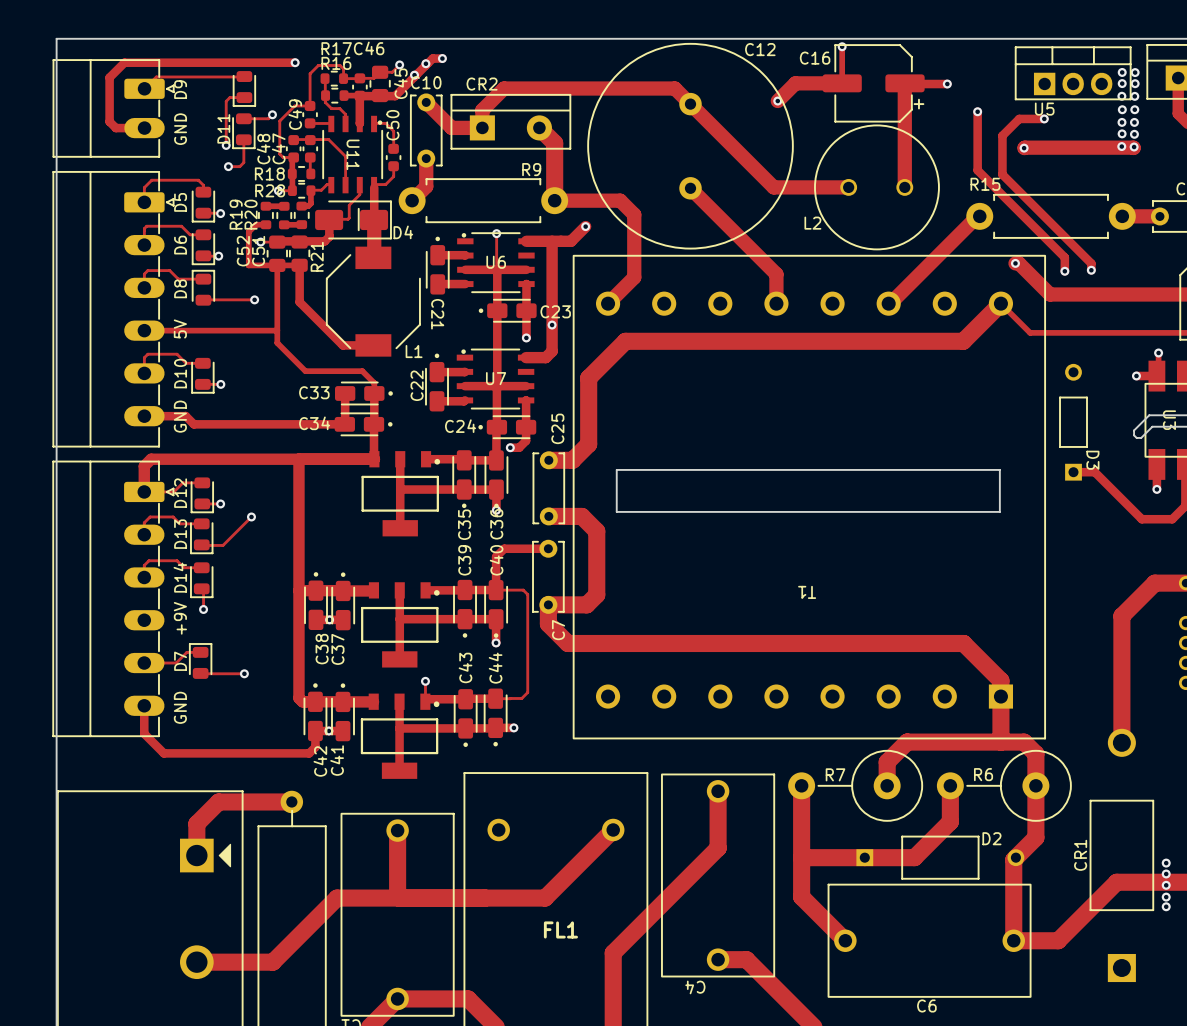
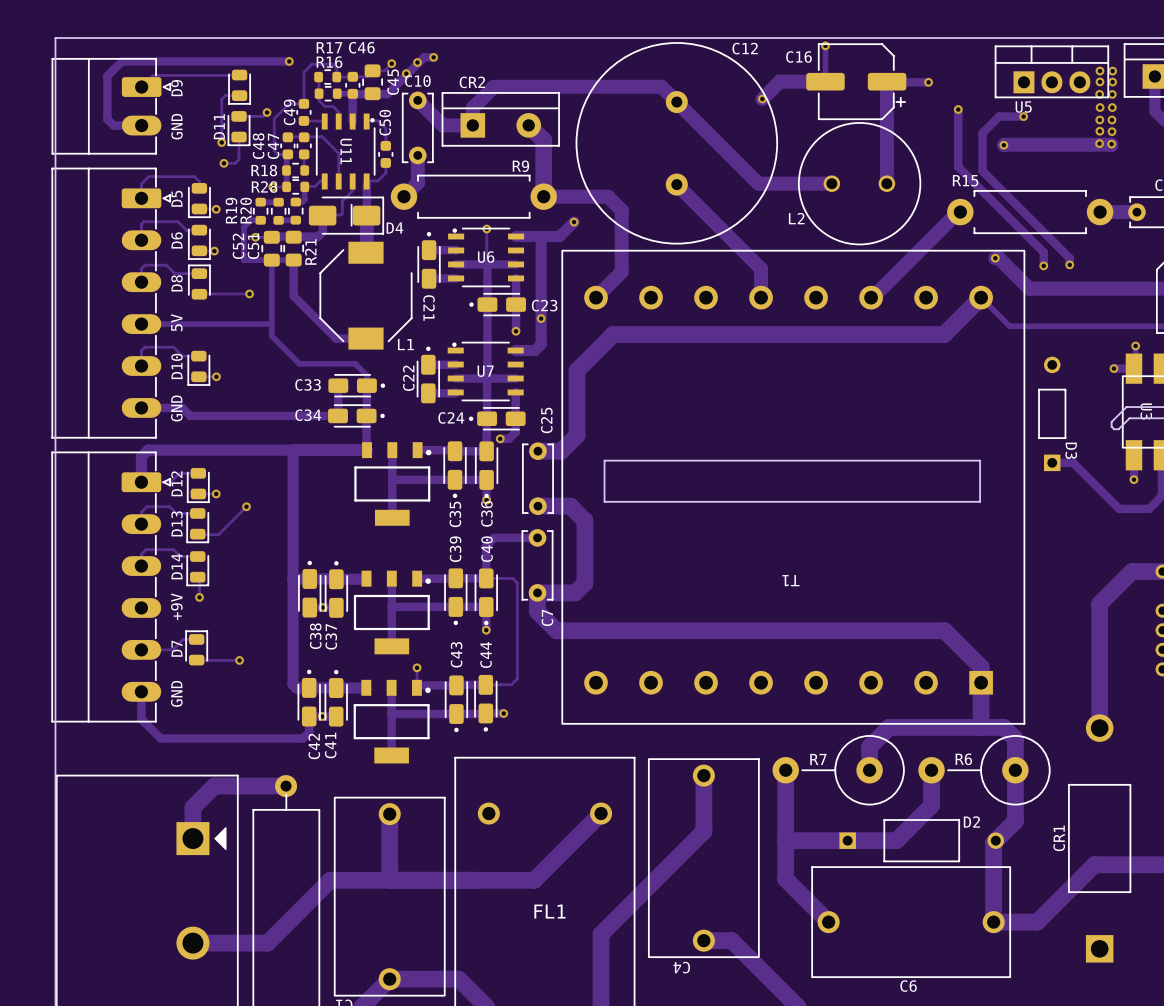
via: (1166, 863) -> none
via: (1166, 873) -> none
via: (1166, 885) -> none
via: (1166, 897) -> none
via: (1166, 906) -> none

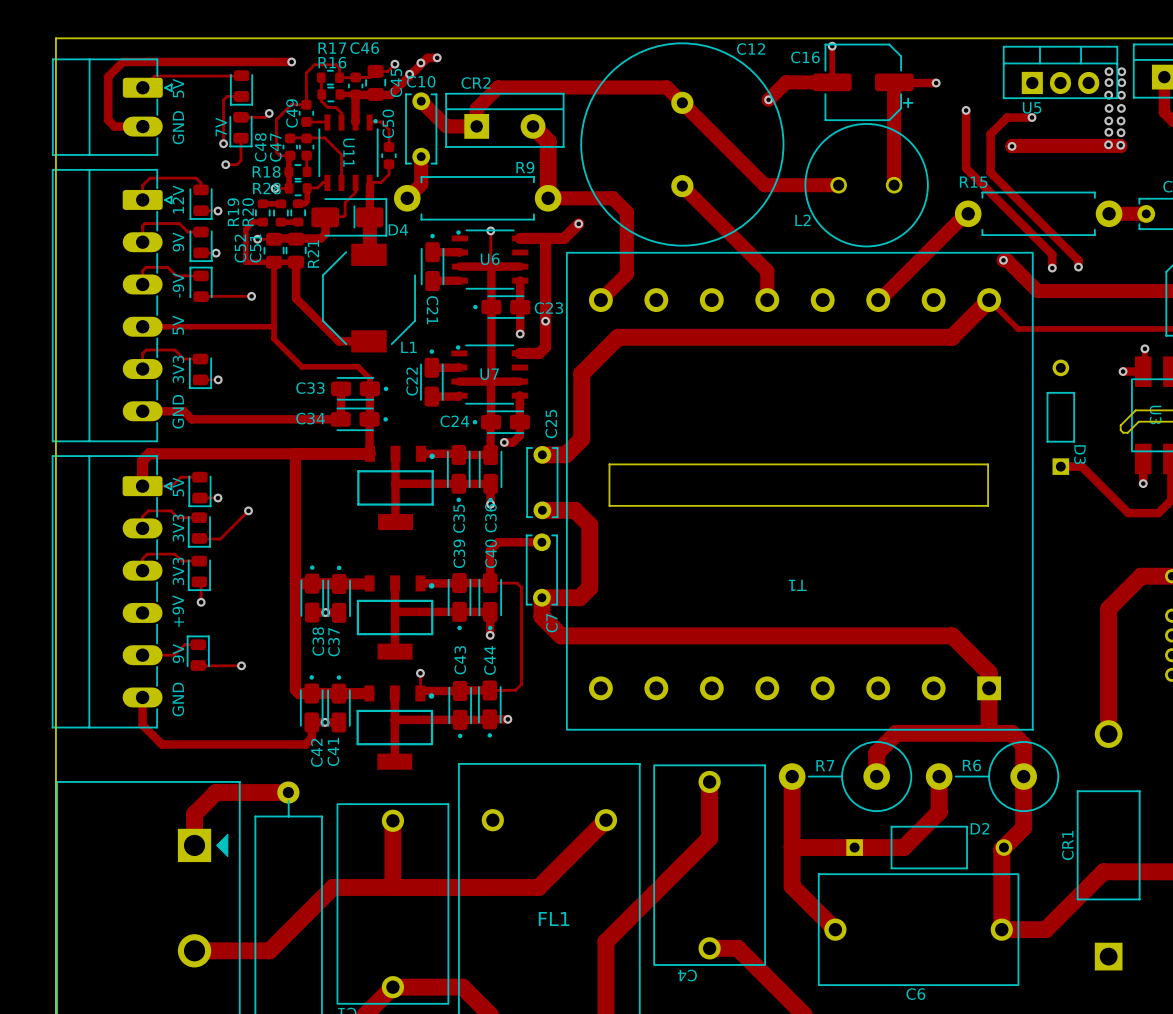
D9 name: D9 (177, 88) -> 5V (178, 88)
D11 name: D11 (219, 126) -> 7V (221, 127)
D5 name: D5 (177, 198) -> 12V (178, 199)
D6 name: D6 (177, 240) -> 9V (178, 242)
D8 name: D8 (177, 283) -> -9V (178, 285)
D10 name: D10 (177, 366) -> 3V3 (178, 369)
D12 name: D12 (176, 483) -> 5V (178, 487)
D13 name: D13 (177, 523) -> 3V3 (178, 528)
D14 name: D14 (176, 566) -> 3V3 (178, 571)
D7 name: D7 (176, 648) -> 9V (178, 653)

